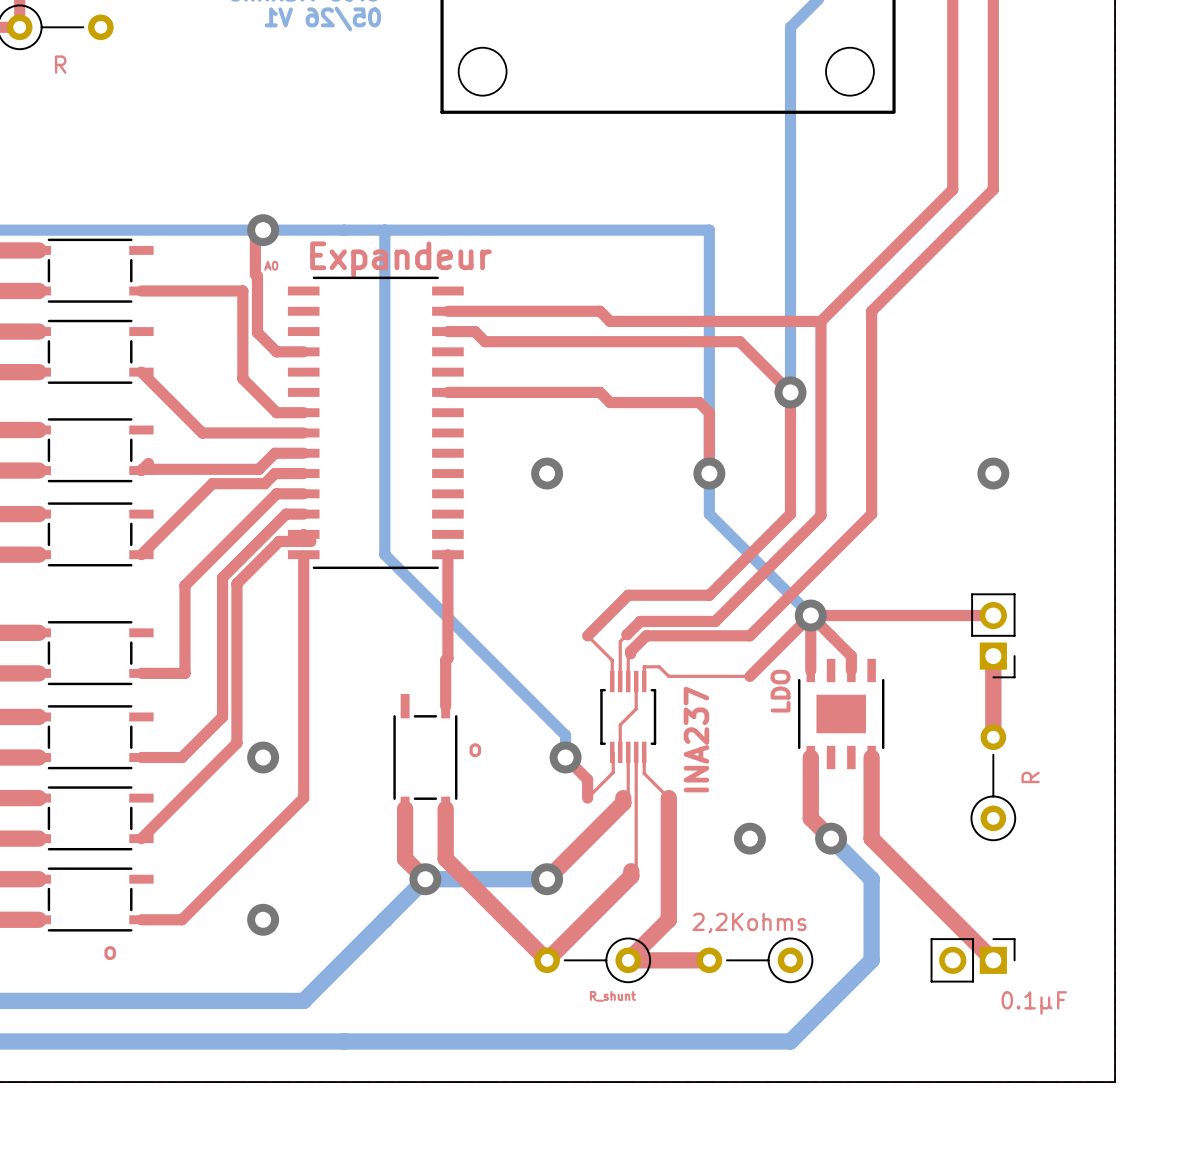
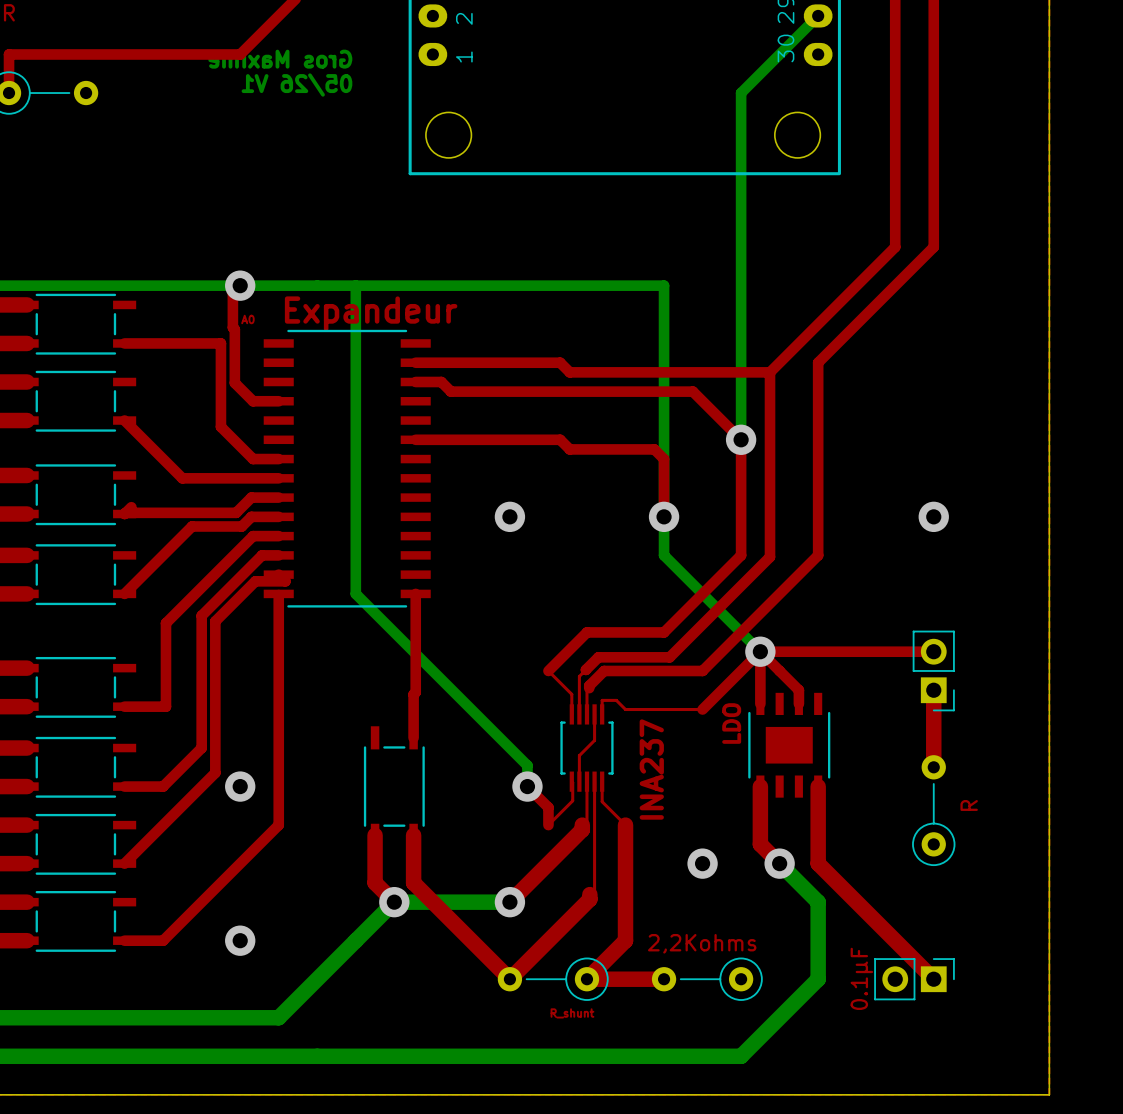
part value: R (60, 64) -> none
text: o (475, 750) -> none
text: o (110, 953) -> none
part value rotation: 0° (1034, 1002) -> 90° counterclockwise (861, 978)
part value position: 0.1µF (1034, 1002) -> 0.1µF (861, 978)

